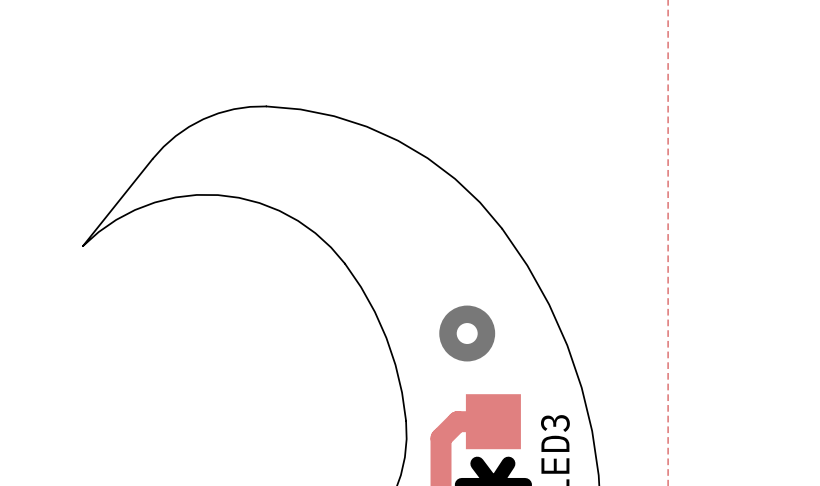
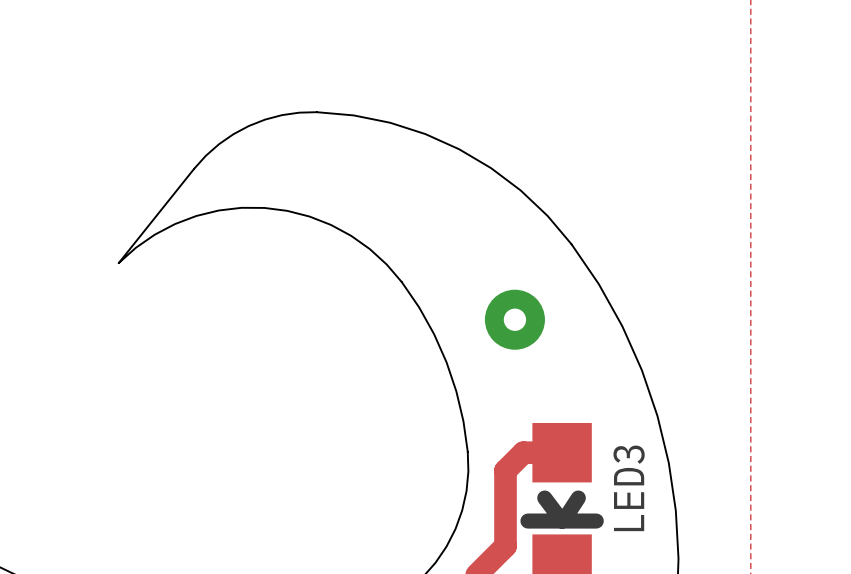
via position: (467, 333) -> (514, 319)

